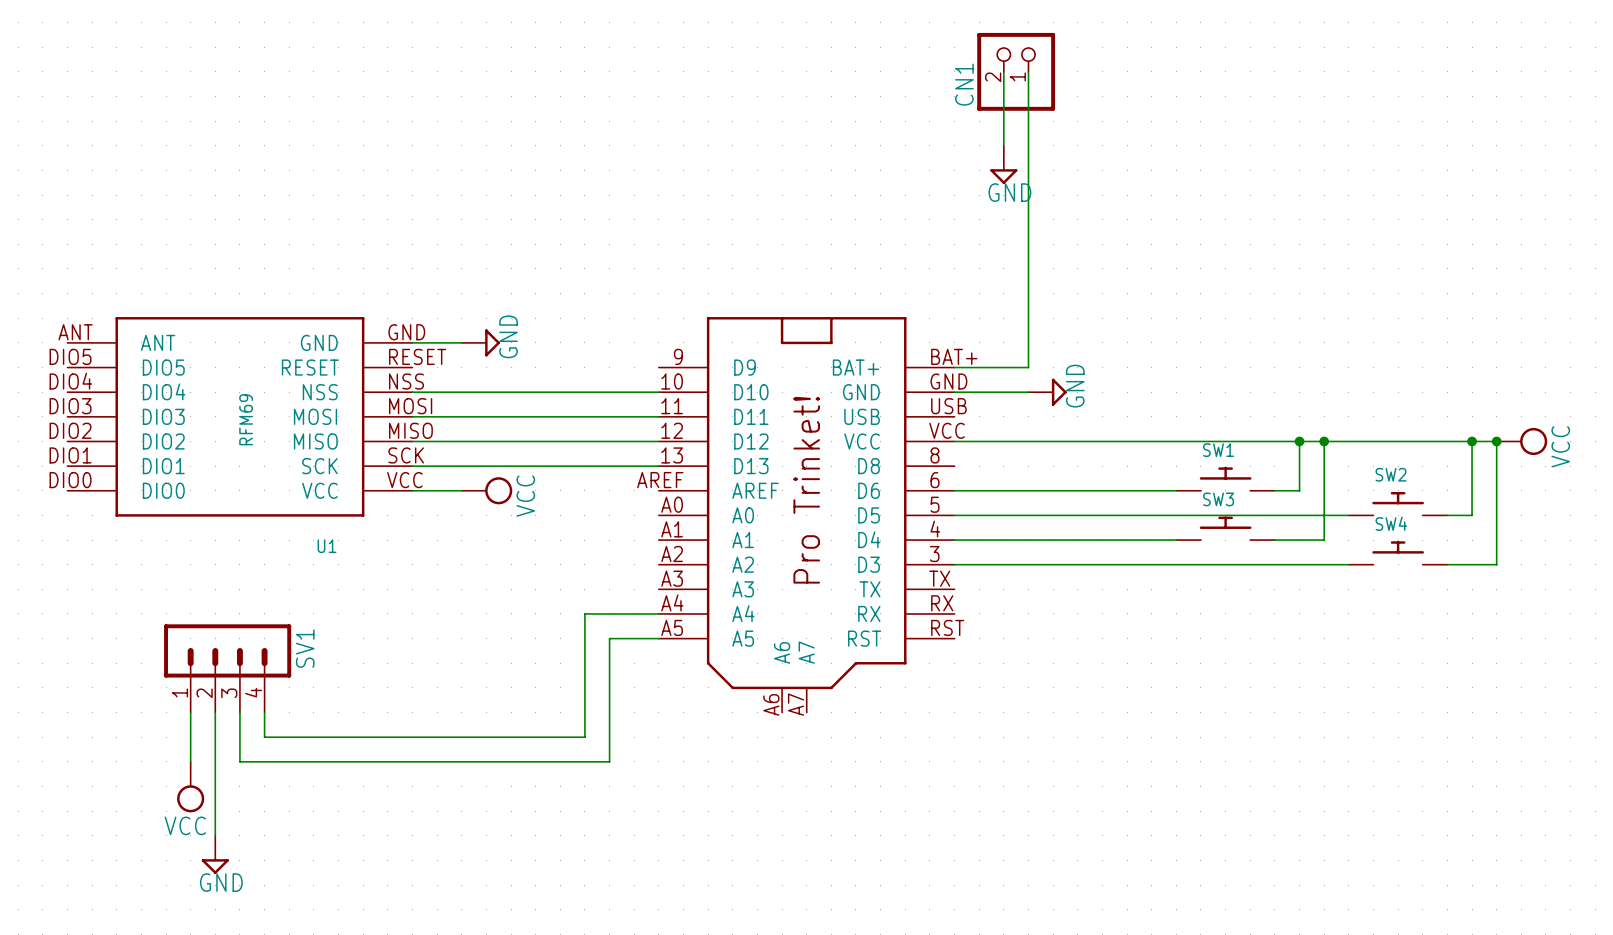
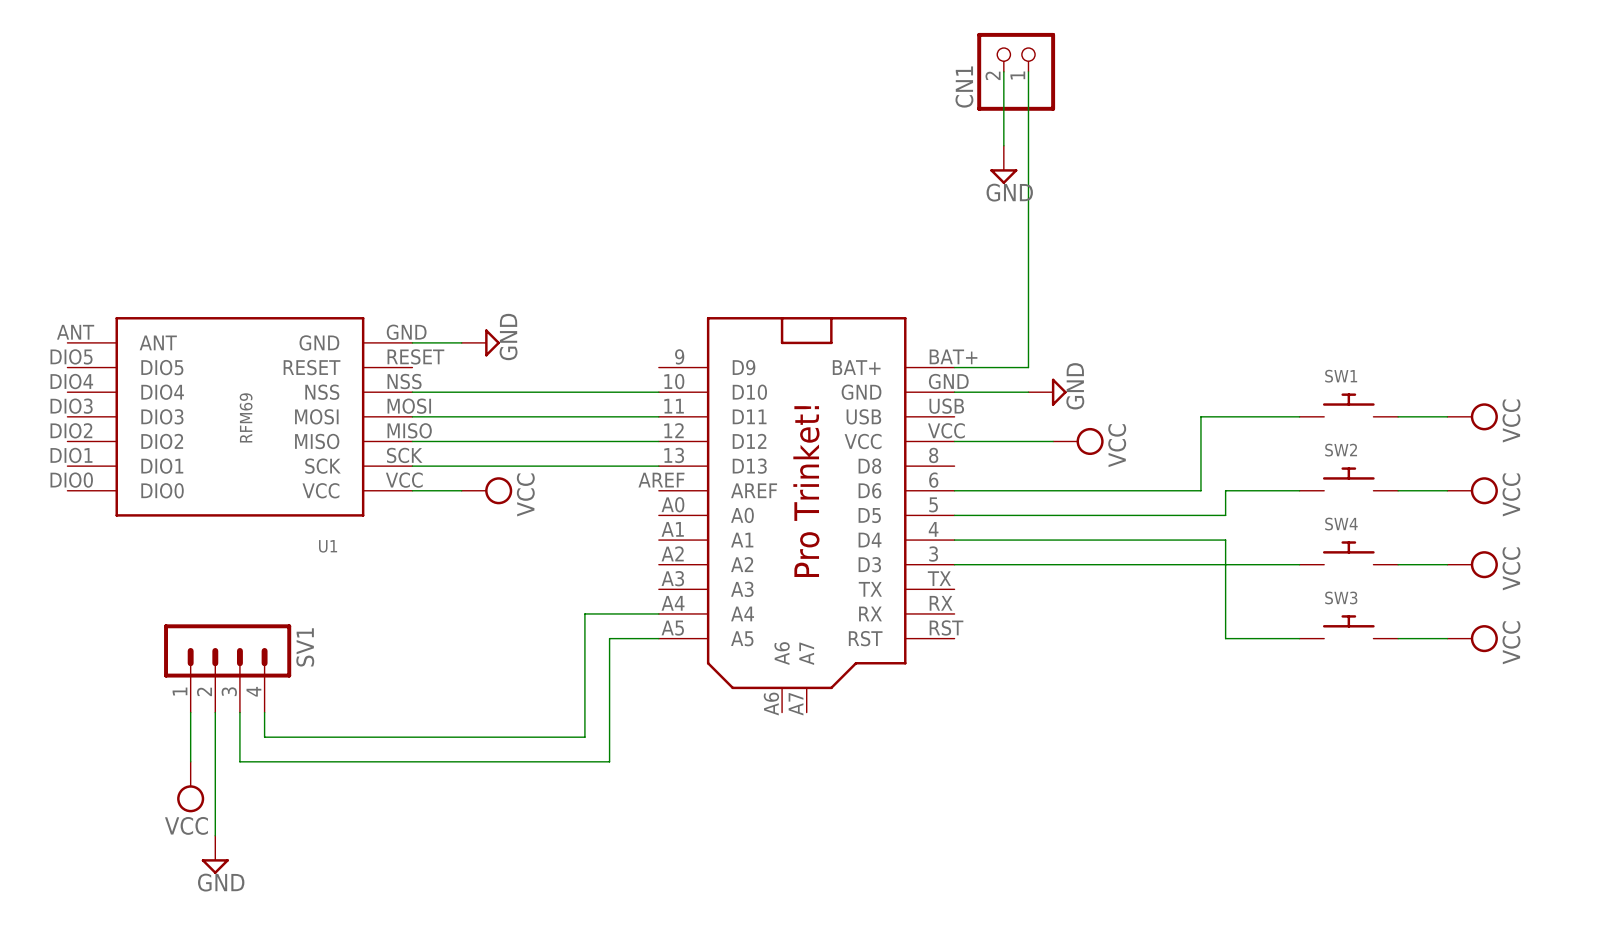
wire: none -> (1299, 416) (1200, 416) (1200, 490) (1176, 490)
wire: none -> (1398, 416) (1447, 416)
power symbol: none -> VCC (1472, 416)
wire: (1053, 441) (1496, 441) (1496, 564) (1447, 564) -> (1398, 564) (1447, 564)
power symbol: none -> VCC (1078, 441)
wire: (1299, 441) (1299, 490) -> none
junction: (1299, 441) -> none
wire: (1324, 441) (1324, 540) (1274, 540) -> none
junction: (1324, 441) -> none
wire: (1472, 441) (1472, 515) (1447, 515) -> none
junction: (1472, 441) -> none
junction: (1496, 441) -> none
power symbol: VCC (1521, 441) -> none
SW1 position: (1225, 479) -> (1348, 405)
power symbol: none -> VCC (1472, 490)
SW2 position: (1398, 503) -> (1348, 479)
wire: (1225, 515) (1348, 515) -> (1225, 515) (1225, 490) (1274, 490)
SW3 position: (1225, 528) -> (1348, 626)
wire: none -> (1176, 540) (1225, 540) (1225, 638) (1299, 638)
SW4 position: (1398, 552) -> (1348, 552)
wire: (1299, 564) (1348, 564) -> (1398, 490) (1447, 490)
power symbol: none -> VCC (1472, 564)
wire: none -> (1398, 638) (1447, 638)
power symbol: none -> VCC (1472, 638)

